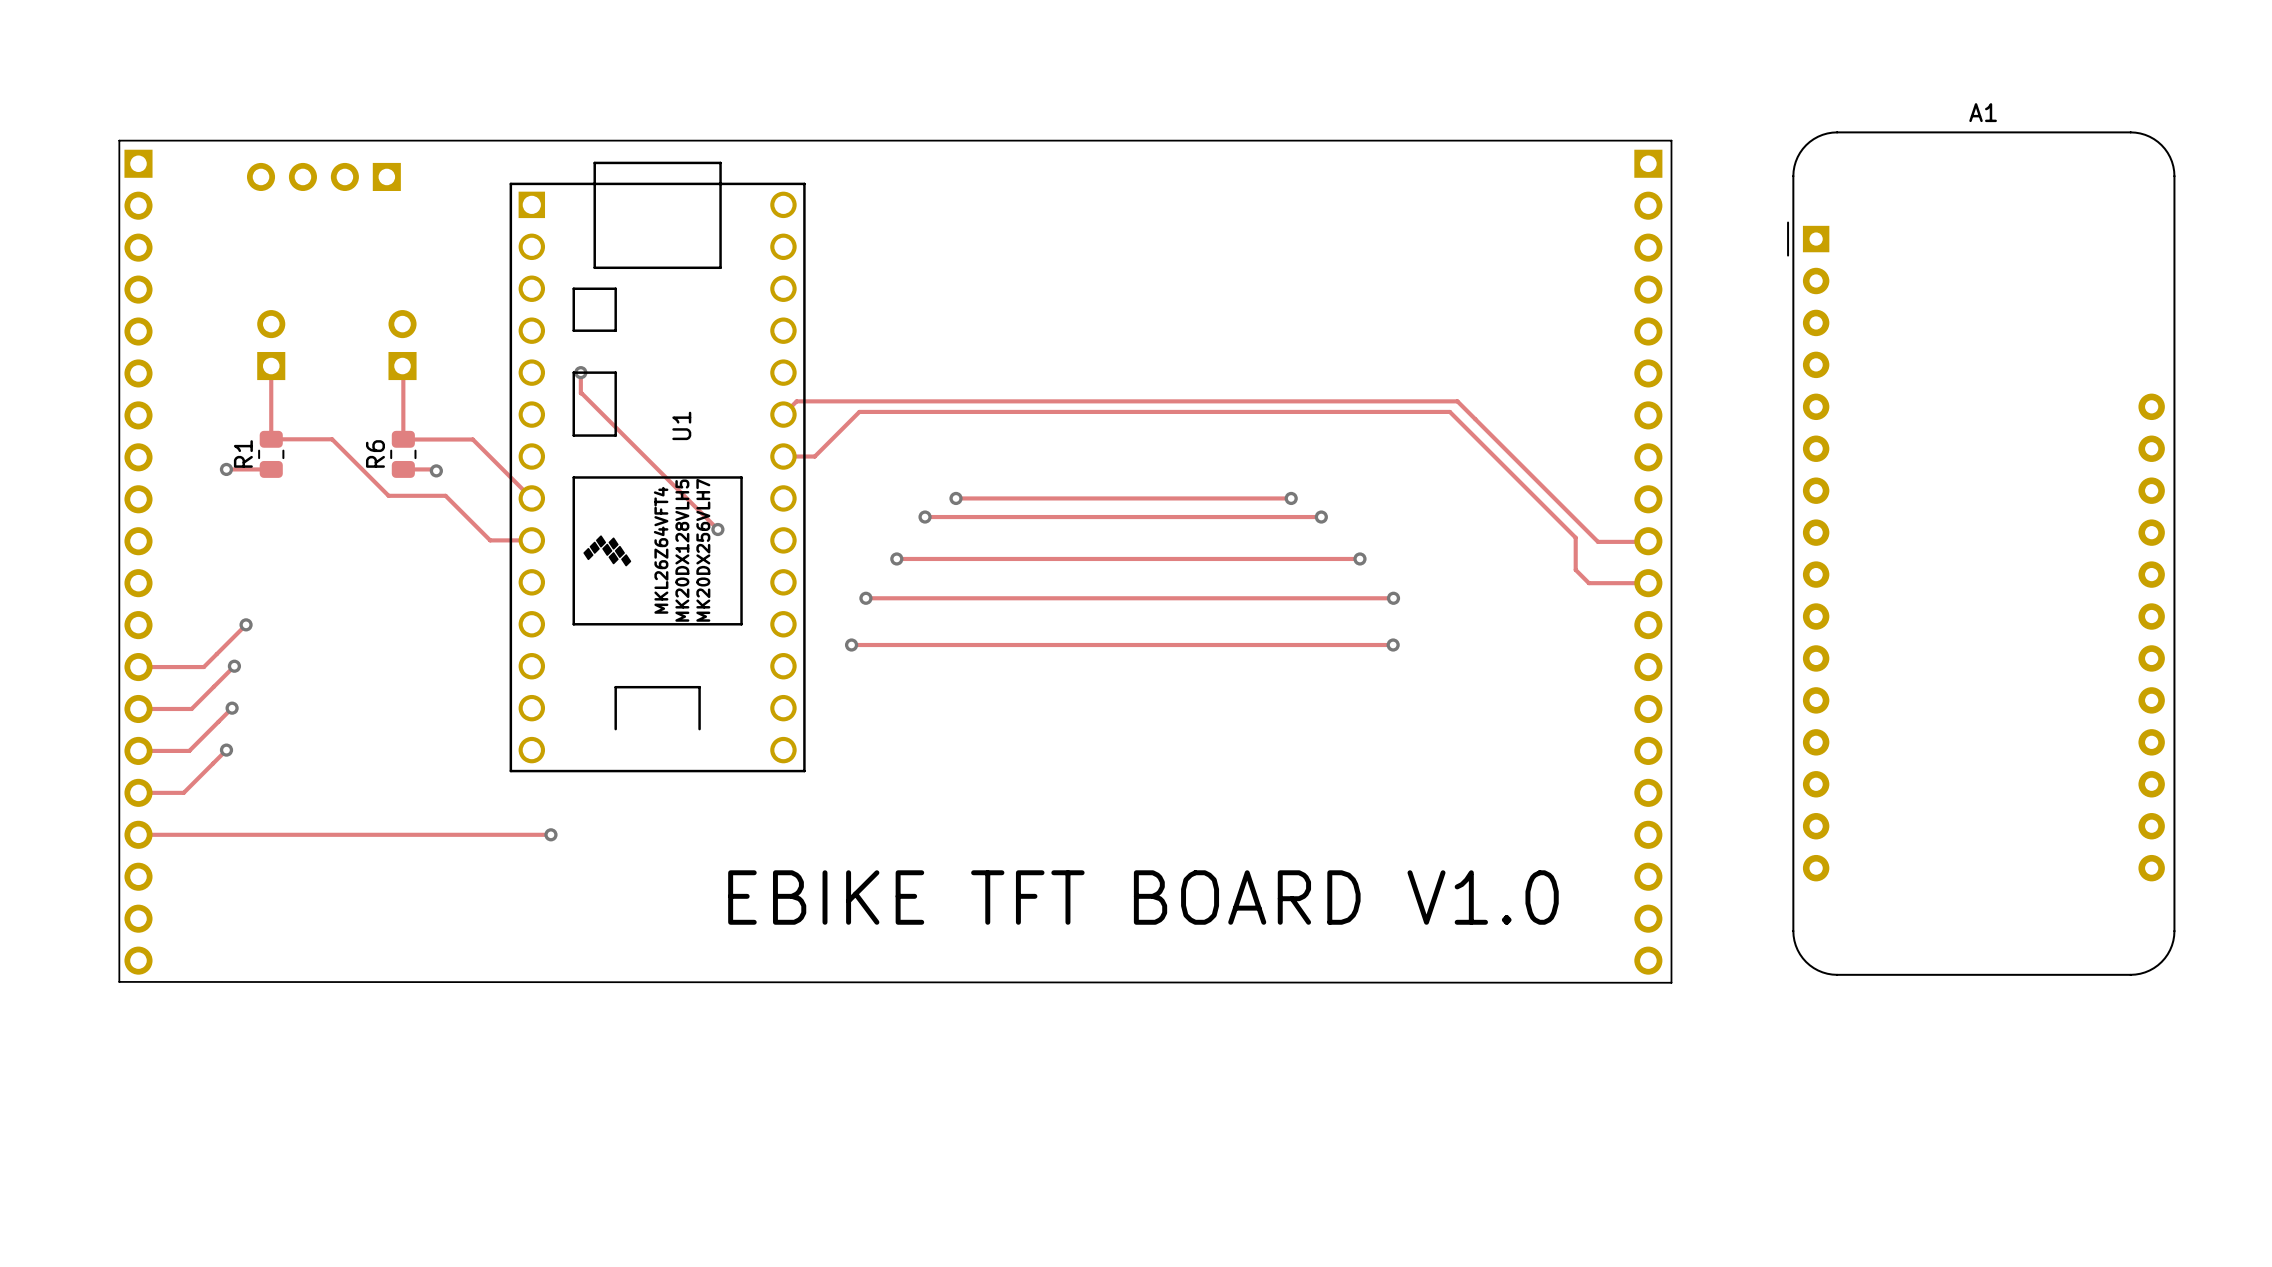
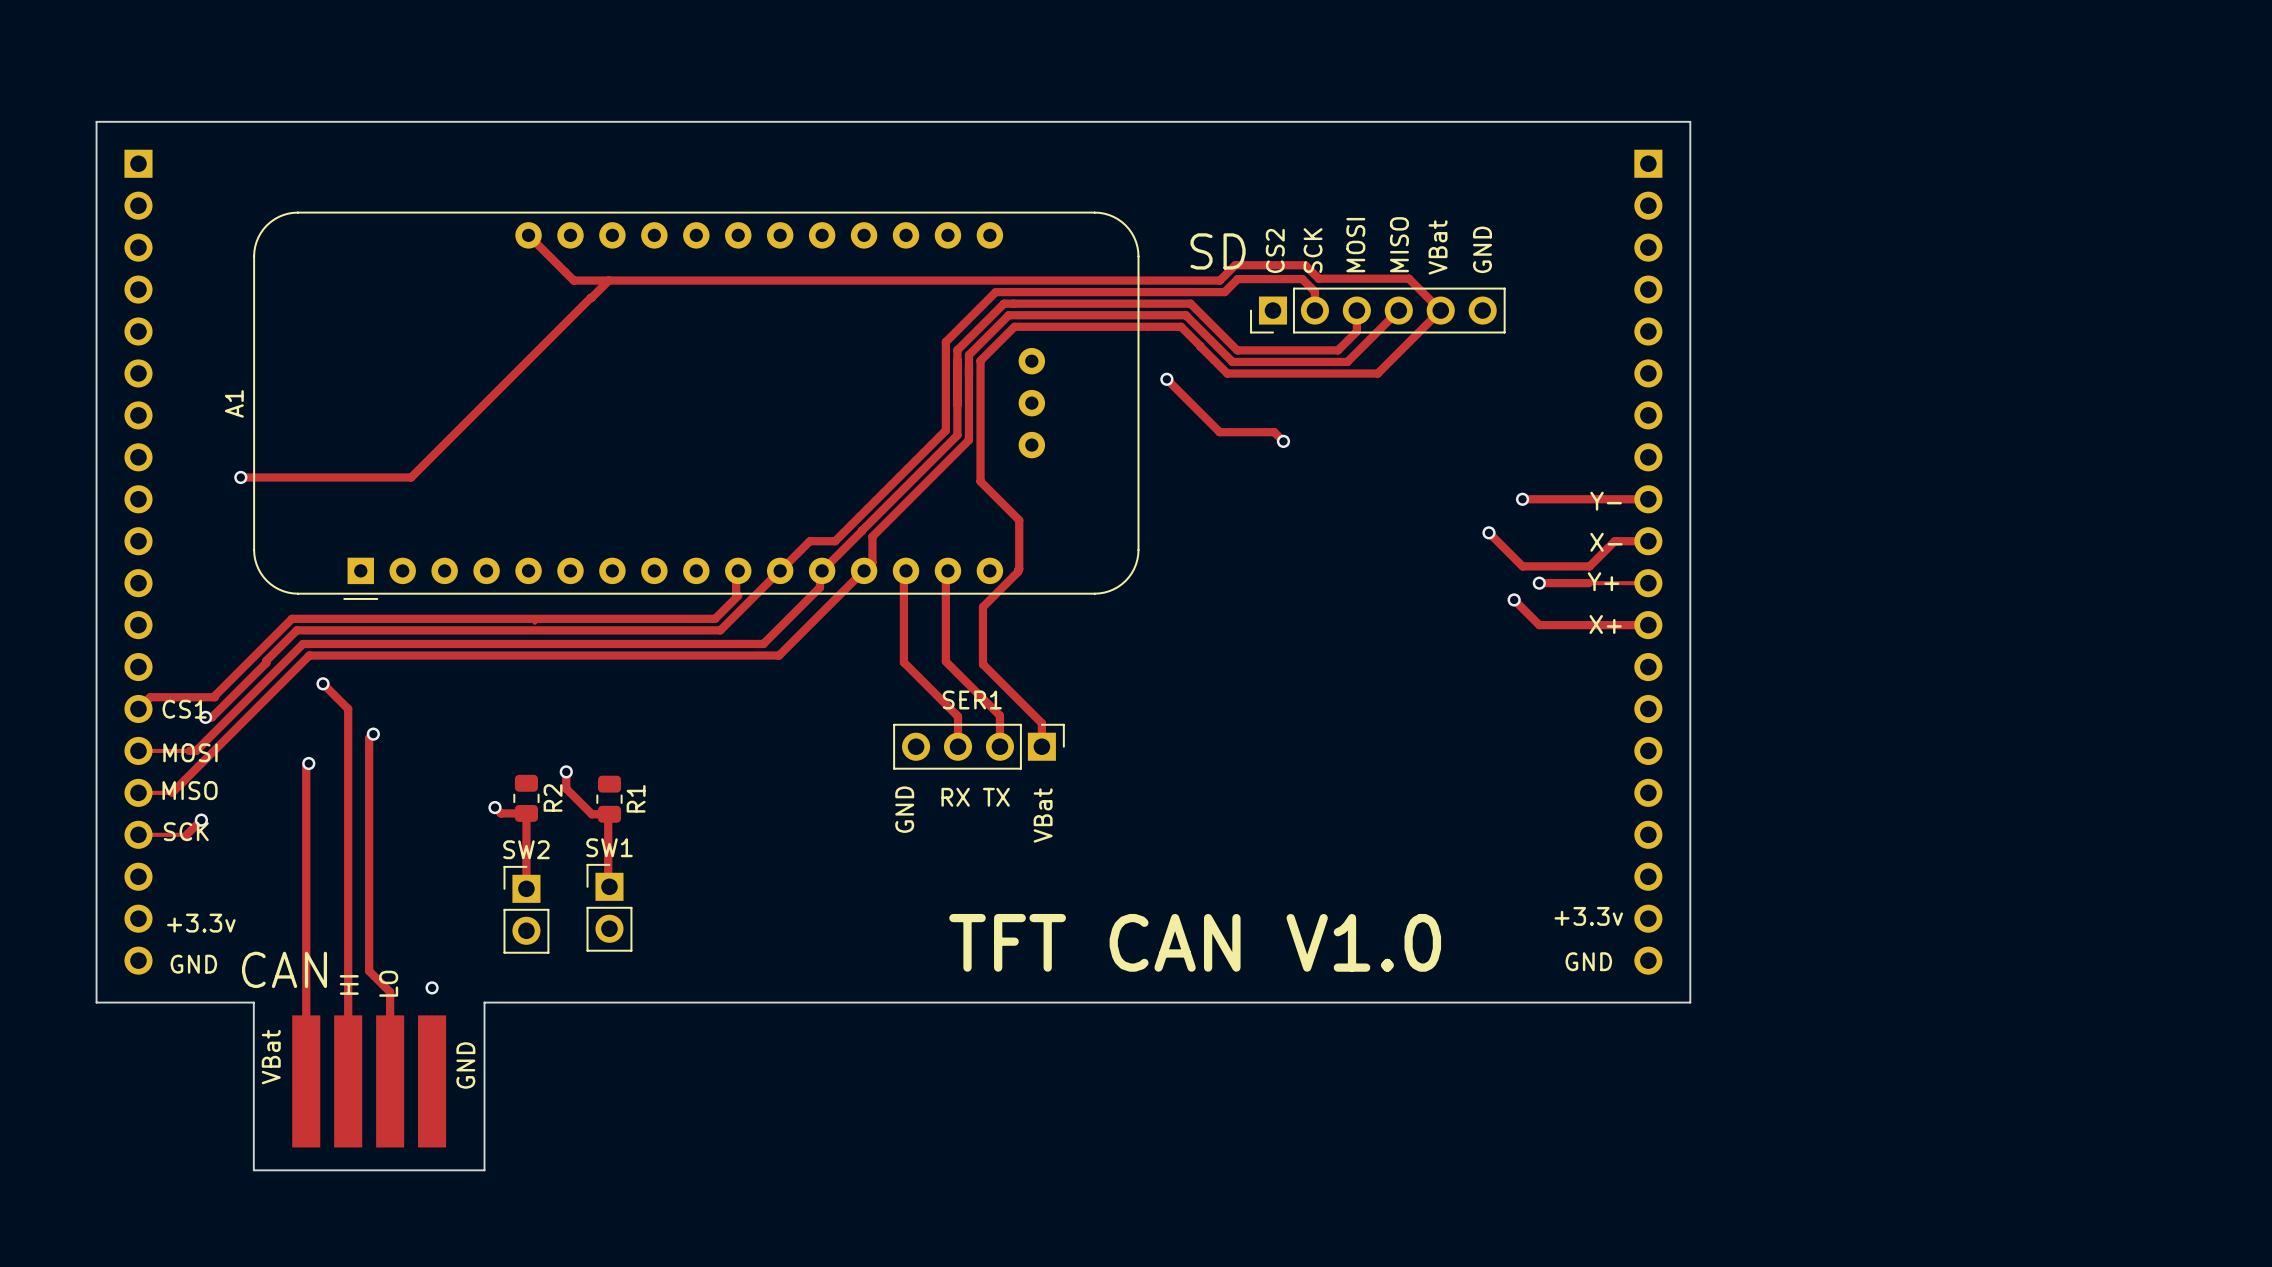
A1 name position: A1 (1983, 112) -> A1 (234, 403)
A1 footprint: [1787, 131, 2176, 976] -> [253, 211, 1140, 600]
board edge: (119, 140) (1671, 140) (1671, 982) (119, 981) (119, 140) -> (96, 121) (96, 1002) (253, 1002) (253, 1170) (484, 1170) (484, 1002) (1690, 1002) (1690, 121) (96, 121)
part: (323, 176) -> none
track: none -> (528, 235) (573, 280) (1219, 280) (1235, 265) (1305, 265) (1318, 278) (1408, 278) (1440, 310) (1377, 373) (1227, 373) (1181, 326) (1014, 326) (980, 360) (980, 481) (1019, 520) (1018, 571) (982, 607) (982, 664) (1041, 723) (1041, 746)
text: none -> MISO (1399, 244)
text: none -> MOSI (1355, 245)
text: none -> VBat (1438, 247)
text: none -> GND (1482, 249)
text: none -> CS2 (1275, 250)
text: none -> SCK (1313, 250)
text: none -> SD (1218, 251)
track: none -> (608, 280) (411, 477) (240, 477)
track: none -> (1314, 310) (1314, 291) (1302, 279) (1237, 279) (1224, 292) (995, 292) (945, 342) (945, 430) (835, 541) (809, 541) (780, 570)
track: none -> (1356, 310) (1356, 331) (1338, 350) (1237, 350) (1190, 303) (1003, 303) (957, 350) (957, 435) (861, 530)
part: none -> (1377, 310)
track: none -> (1398, 310) (1347, 361) (1232, 361) (1185, 315) (1008, 315) (968, 355) (968, 440) (872, 536) (872, 562) (864, 570)
part: (271, 345) -> none
part: (402, 345) -> none
track: (271, 366) (271, 439) (332, 439) (388, 495) (445, 495) (490, 540) (531, 540) -> none
track: (402, 366) (403, 439) -> none
track: (580, 372) (580, 393) (717, 529) -> none
via: (580, 372) -> none
track: none -> (1166, 379) (1219, 432) (1274, 432) (1283, 441)
via: none -> (1166, 379)
track: (783, 414) (796, 401) (1457, 401) (1598, 541) (1648, 541) -> (1488, 532) (1522, 566) (1589, 566) (1614, 541) (1648, 541)
track: (403, 439) (472, 439) (531, 498) -> none
via: none -> (1283, 441)
R1 name position: R1 (243, 453) -> R1 (636, 798)
R1 position: (271, 454) -> (609, 799)
R6: (403, 454) -> none
track: (783, 456) (814, 456) (859, 411) (1449, 411) (1575, 537) (1575, 569) (1588, 583) -> (1539, 583) (1588, 583)
U1: (657, 467) -> none
track: (226, 469) (271, 469) -> none
via: (226, 469) -> none
track: (403, 469) (436, 470) -> none
via: (436, 470) -> none
via: none -> (240, 477)
track: (956, 498) (1291, 498) -> none
via: (956, 498) -> none
via: (1291, 498) -> none
track: none -> (1522, 499) (1648, 499)
via: none -> (1522, 499)
text: none -> Y- (1606, 501)
track: (925, 517) (1321, 517) -> none
via: (925, 517) -> none
via: (1321, 517) -> none
via: (717, 529) -> none
track: none -> (861, 531) (822, 570)
via: none -> (1488, 532)
text: none -> X- (1606, 542)
track: (896, 558) (1359, 558) -> none
via: (896, 558) -> none
via: (1359, 558) -> none
track: none -> (778, 572) (720, 630) (296, 630) (211, 717) (205, 717)
track: none -> (903, 572) (903, 662) (958, 716) (958, 746)
track: none -> (945, 572) (945, 661) (999, 715) (999, 746)
text: none -> Y+ (1603, 581)
via: none -> (1539, 583)
track: (865, 598) (1393, 598) -> none
via: (865, 598) -> none
via: (1393, 598) -> none
track: none -> (1514, 599) (1539, 625) (1648, 625)
via: none -> (1514, 599)
track: (246, 624) (203, 667) (138, 667) -> none
via: (246, 624) -> none
text: none -> X+ (1605, 624)
track: (851, 645) (1393, 645) -> none
via: (851, 645) -> none
via: (1393, 645) -> none
track: (234, 666) (191, 708) (138, 708) -> (736, 572) (736, 593) (738, 595) (715, 618) (292, 618) (214, 697) (150, 697) (138, 708)
via: (234, 666) -> none
track: none -> (323, 683) (348, 708) (348, 1117)
via: none -> (323, 683)
track: (232, 708) (189, 750) -> (820, 572) (820, 587) (763, 643) (303, 643) (196, 750) (189, 750)
via: (232, 708) -> none
text: none -> CS1 (184, 709)
via: none -> (205, 717)
track: none -> (373, 734) (369, 738) (369, 971) (390, 992) (390, 1075)
via: none -> (373, 734)
SER1: none -> (978, 746)
track: (226, 750) (183, 792) (172, 792) -> (861, 572) (779, 655) (309, 655) (172, 792)
via: (226, 750) -> none
text: none -> MOSI (190, 752)
track: none -> (308, 763) (306, 766) (306, 1075)
via: none -> (308, 763)
track: none -> (566, 771) (566, 788) (591, 814) (609, 814)
via: none -> (566, 771)
text: none -> MISO (190, 790)
text: none -> RX (955, 797)
text: none -> TX (996, 797)
R2: none -> (526, 798)
track: none -> (494, 807) (500, 813) (526, 813)
via: none -> (494, 807)
text: none -> GND (904, 809)
track: none -> (608, 813) (608, 885)
track: none -> (526, 814) (526, 887)
text: none -> VBat (1043, 815)
via: none -> (201, 820)
text: none -> SCK (186, 831)
track: (186, 834) (551, 834) -> (186, 834) (201, 820)
via: (550, 834) -> none
text: EBIKE TFT BOARD V1.0 (1143, 897) -> TFT CAN V1.0 (1195, 942)
SW1: none -> (609, 907)
SW2: none -> (526, 909)
text: none -> +3.3v (1588, 916)
text: none -> +3.3v (201, 923)
text: none -> GND (1588, 961)
text: none -> GND (193, 964)
text: none -> CAN (284, 969)
text: none -> LO (388, 983)
text: none -> HI (349, 984)
via: none -> (432, 987)
text: none -> VBat (271, 1057)
text: none -> GND (465, 1065)
part: none -> (369, 1081)

